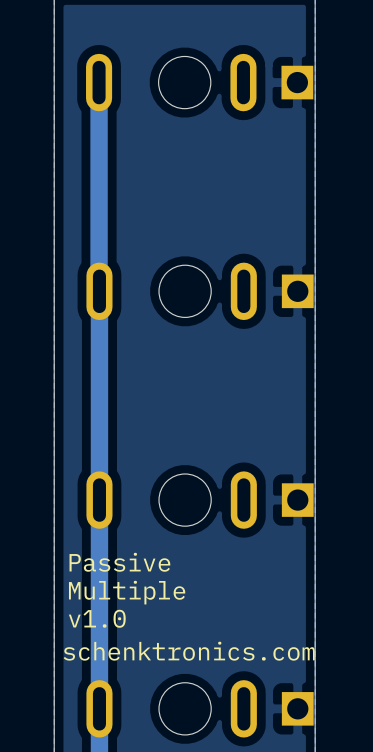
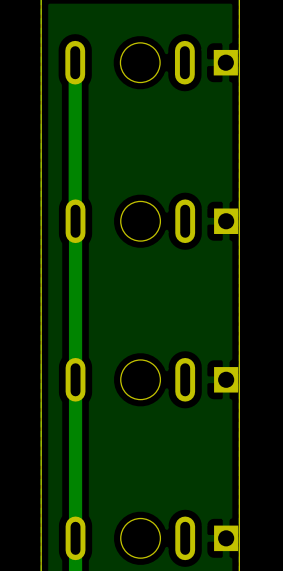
text: Passive (119, 562) -> none
text: Multiple (127, 592) -> none
text: v1.0 (97, 618) -> none
text: schenktronics.com (189, 651) -> none

